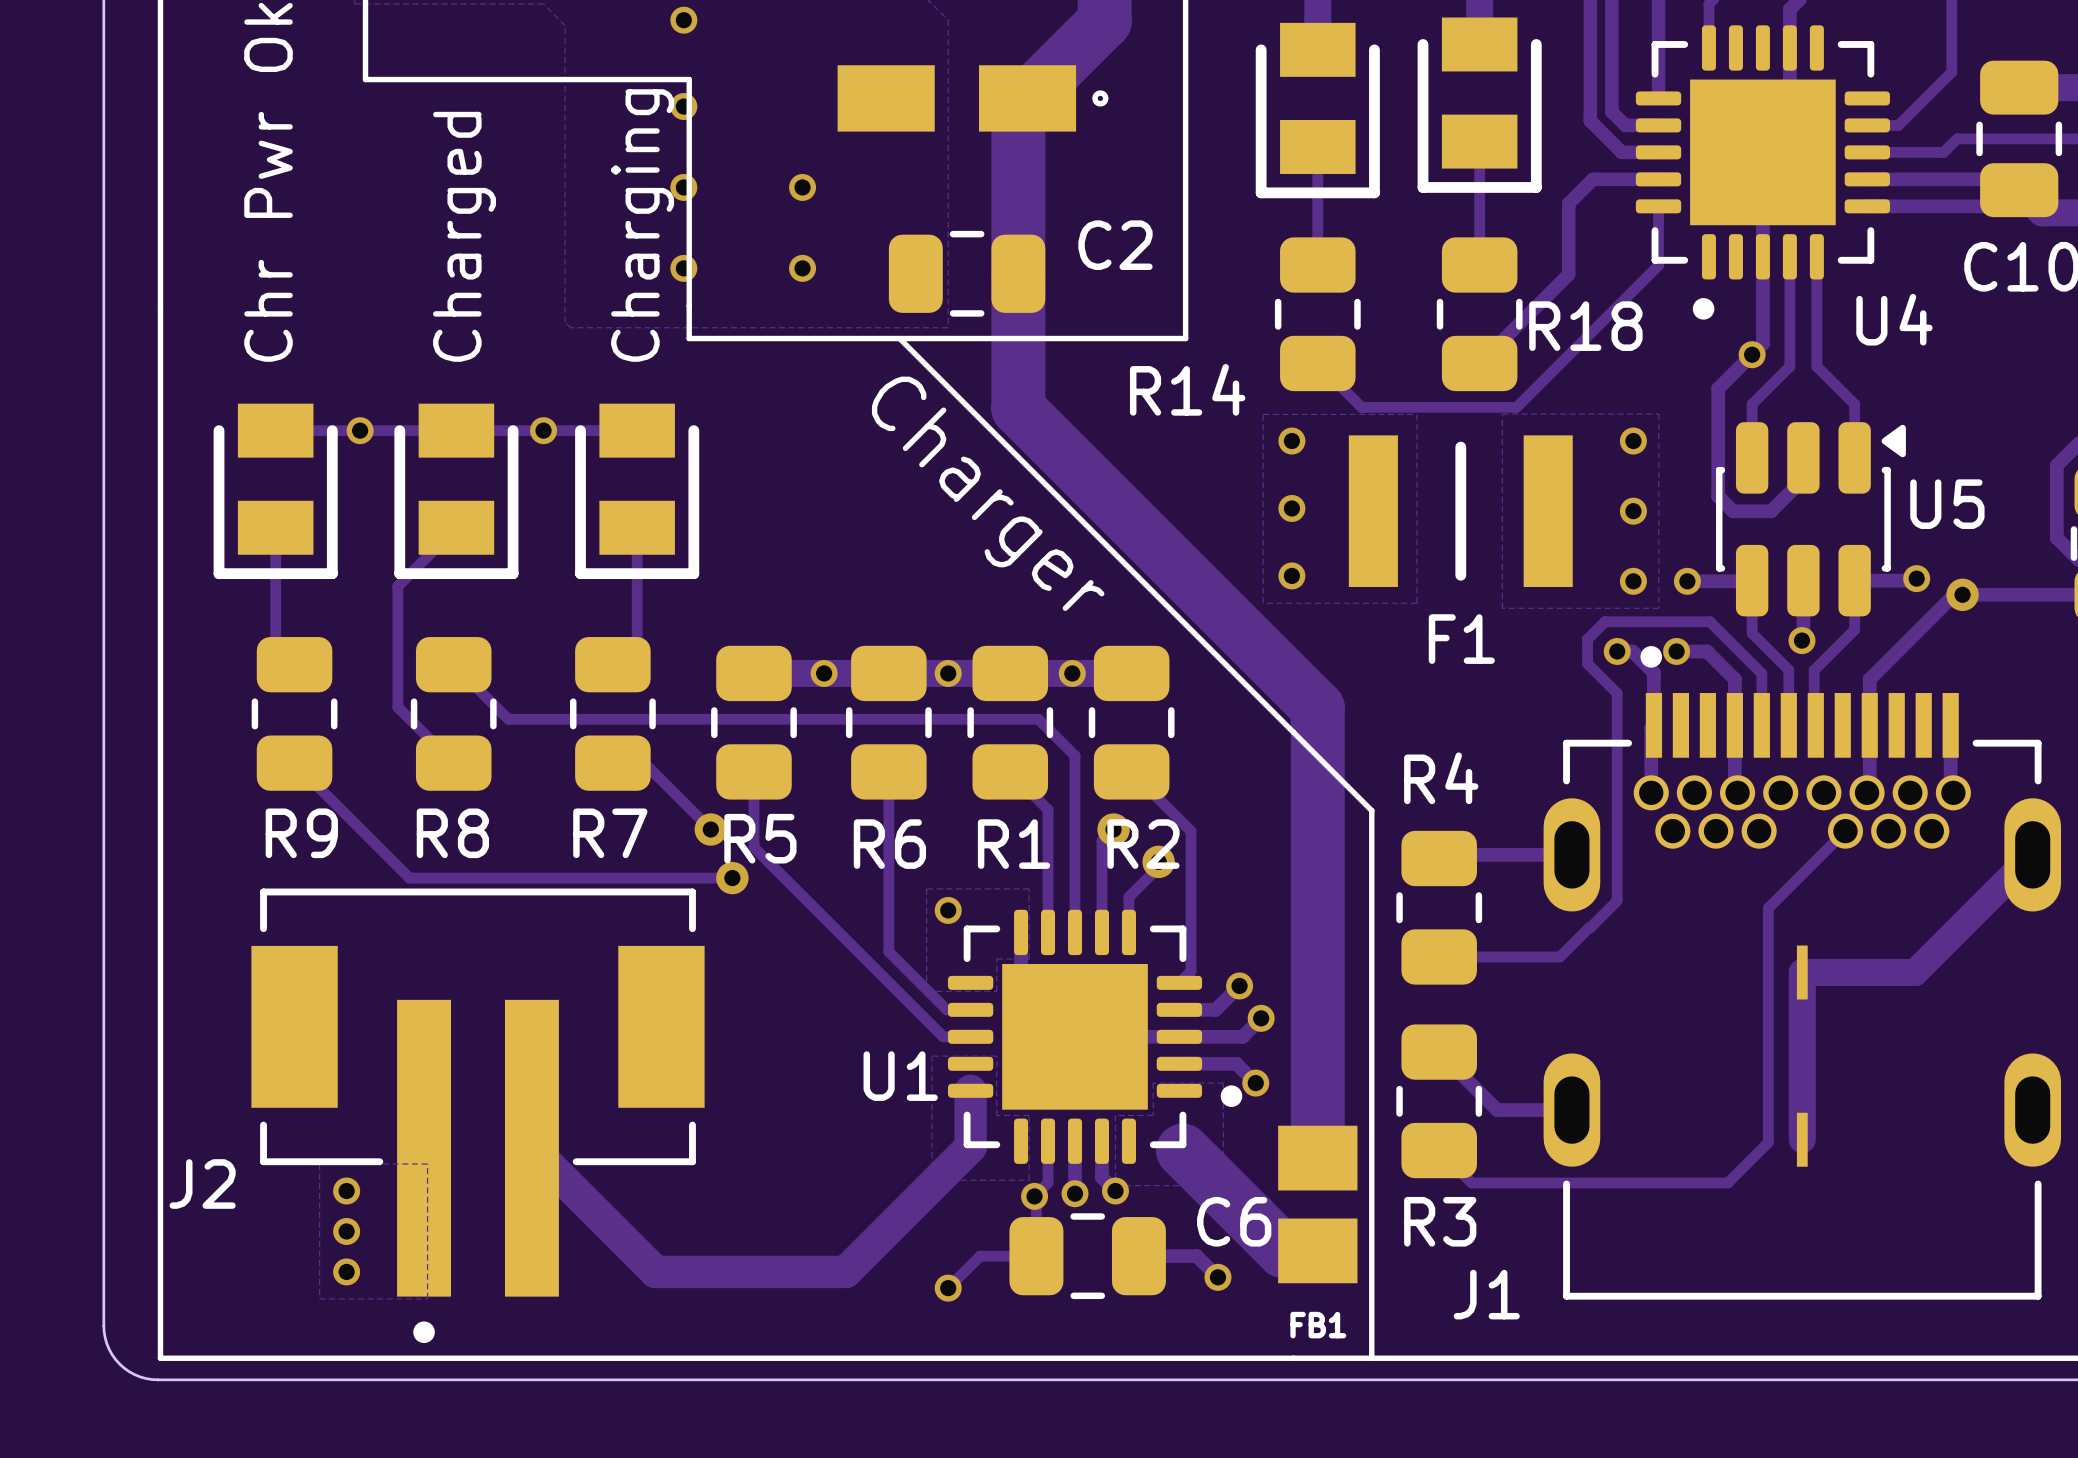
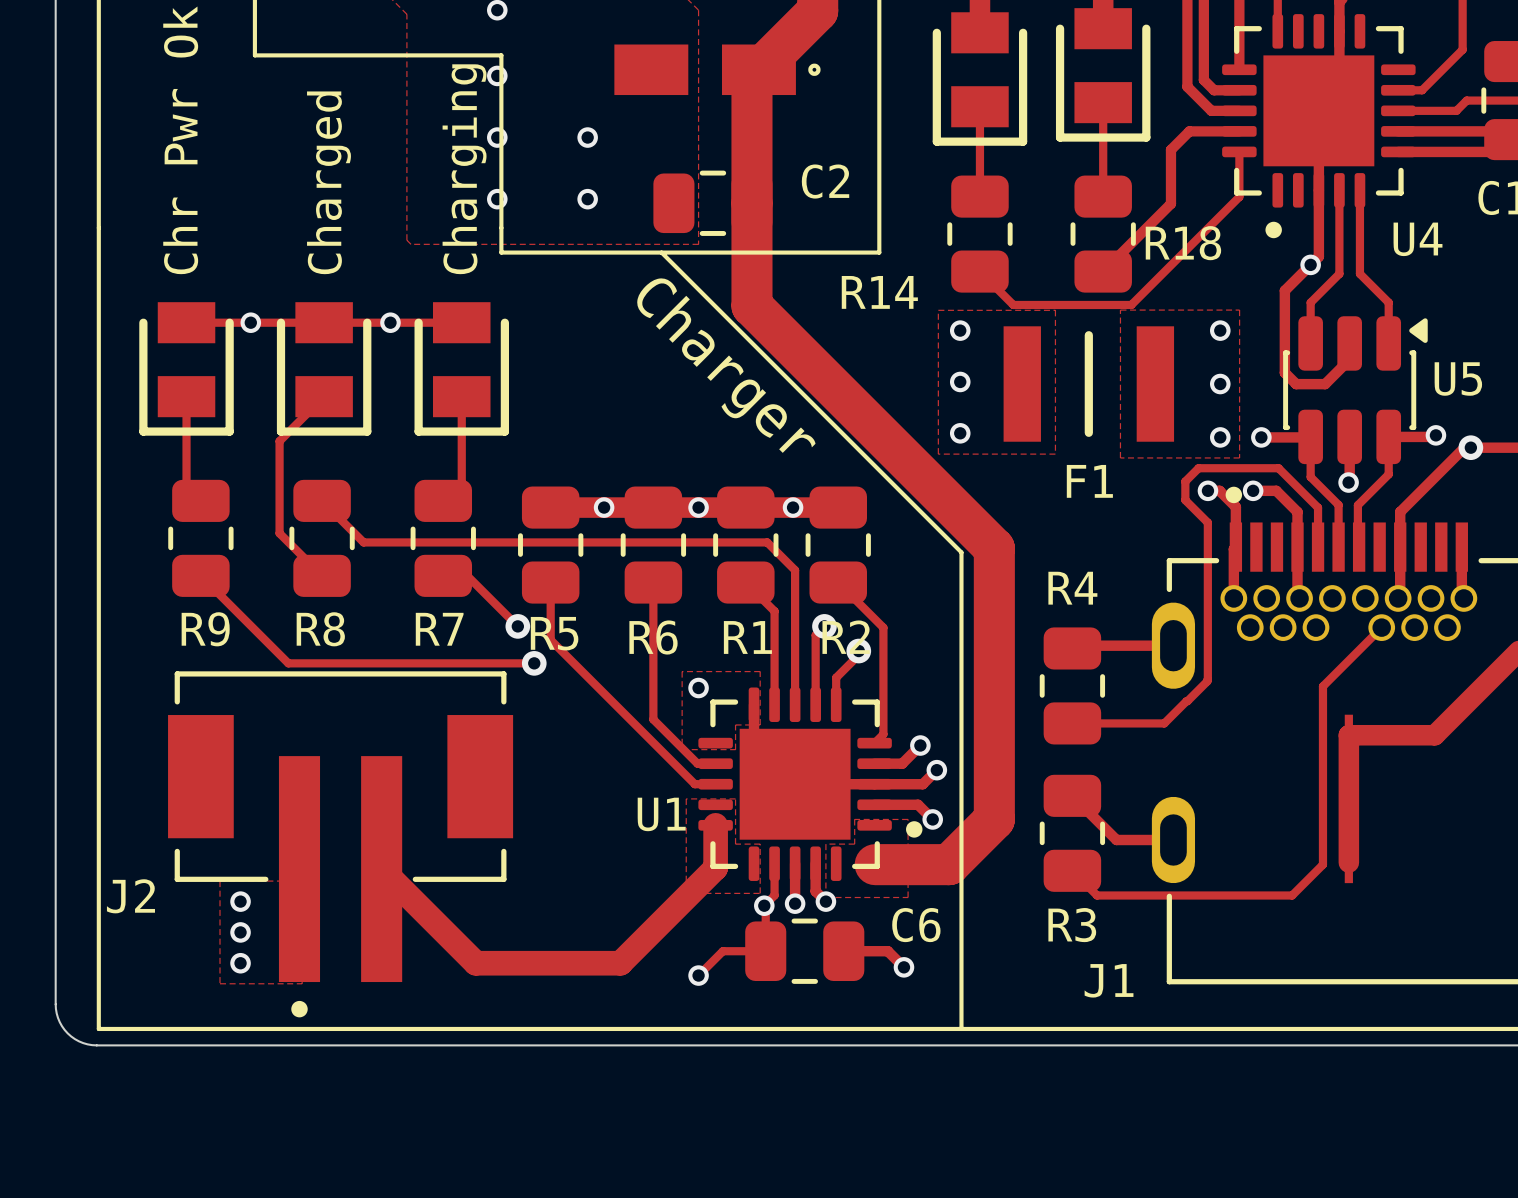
track: (1317, 708) (1317, 1158) -> (979, 533) (994, 548) (994, 819) (949, 864) (875, 864)
line: (1293, 732) (1371, 810) (1371, 1358) -> (961, 552) (961, 1028)
track: (1182, 1150) (1283, 1250) (1317, 1250) -> none
FB1: (1317, 1204) -> none

